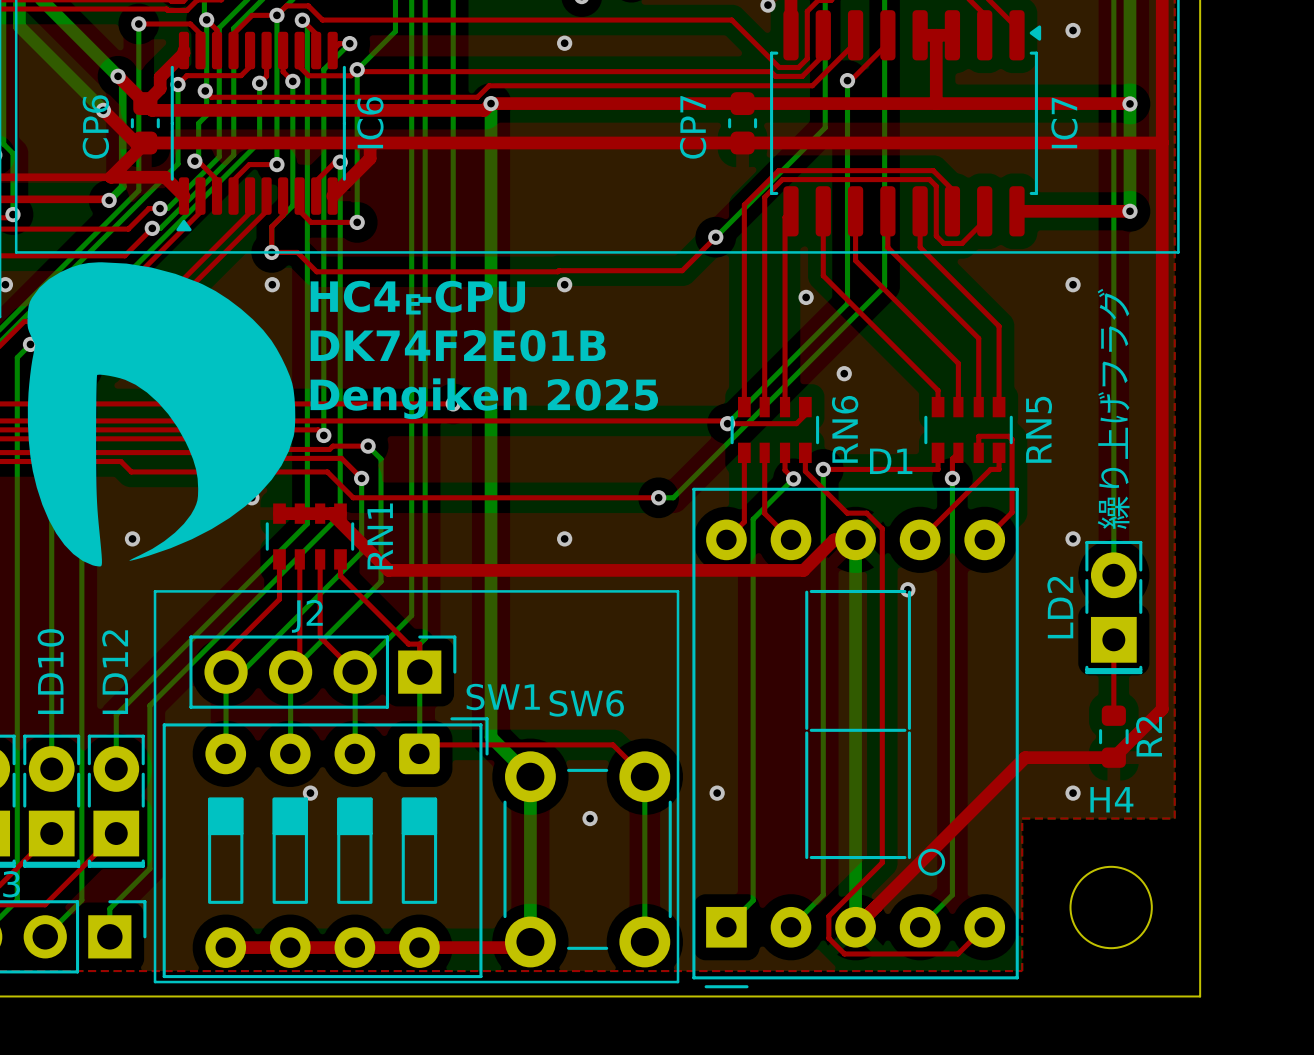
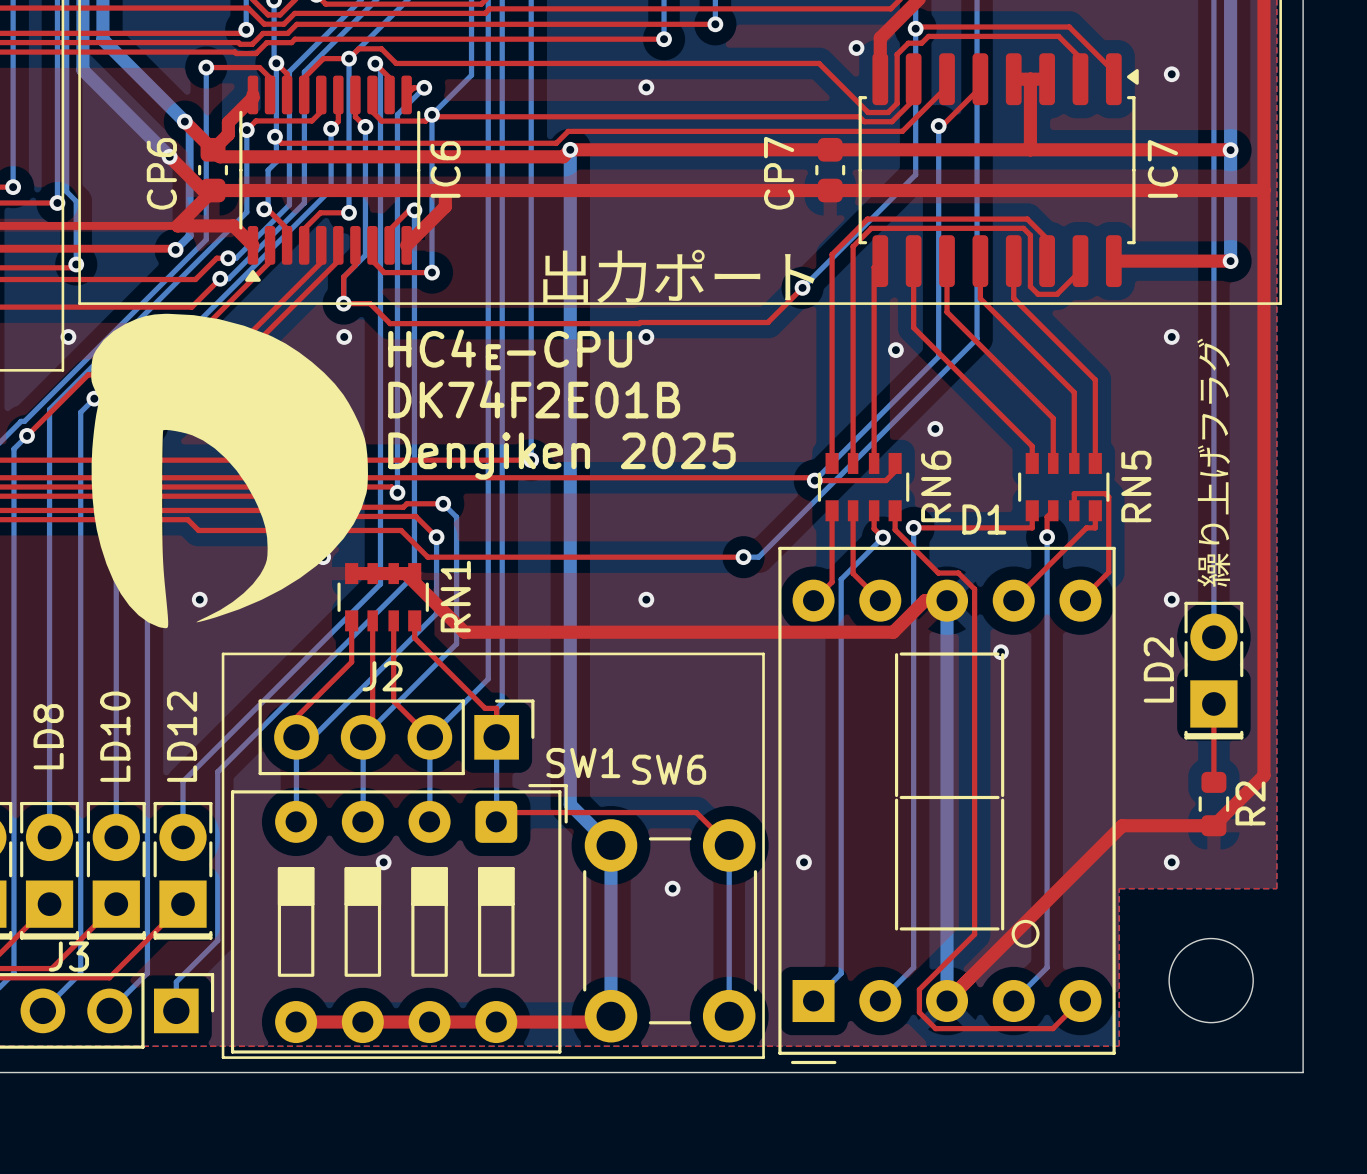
text: none -> 出力ポート (678, 276)
H4 name: H4 (1111, 799) -> none

